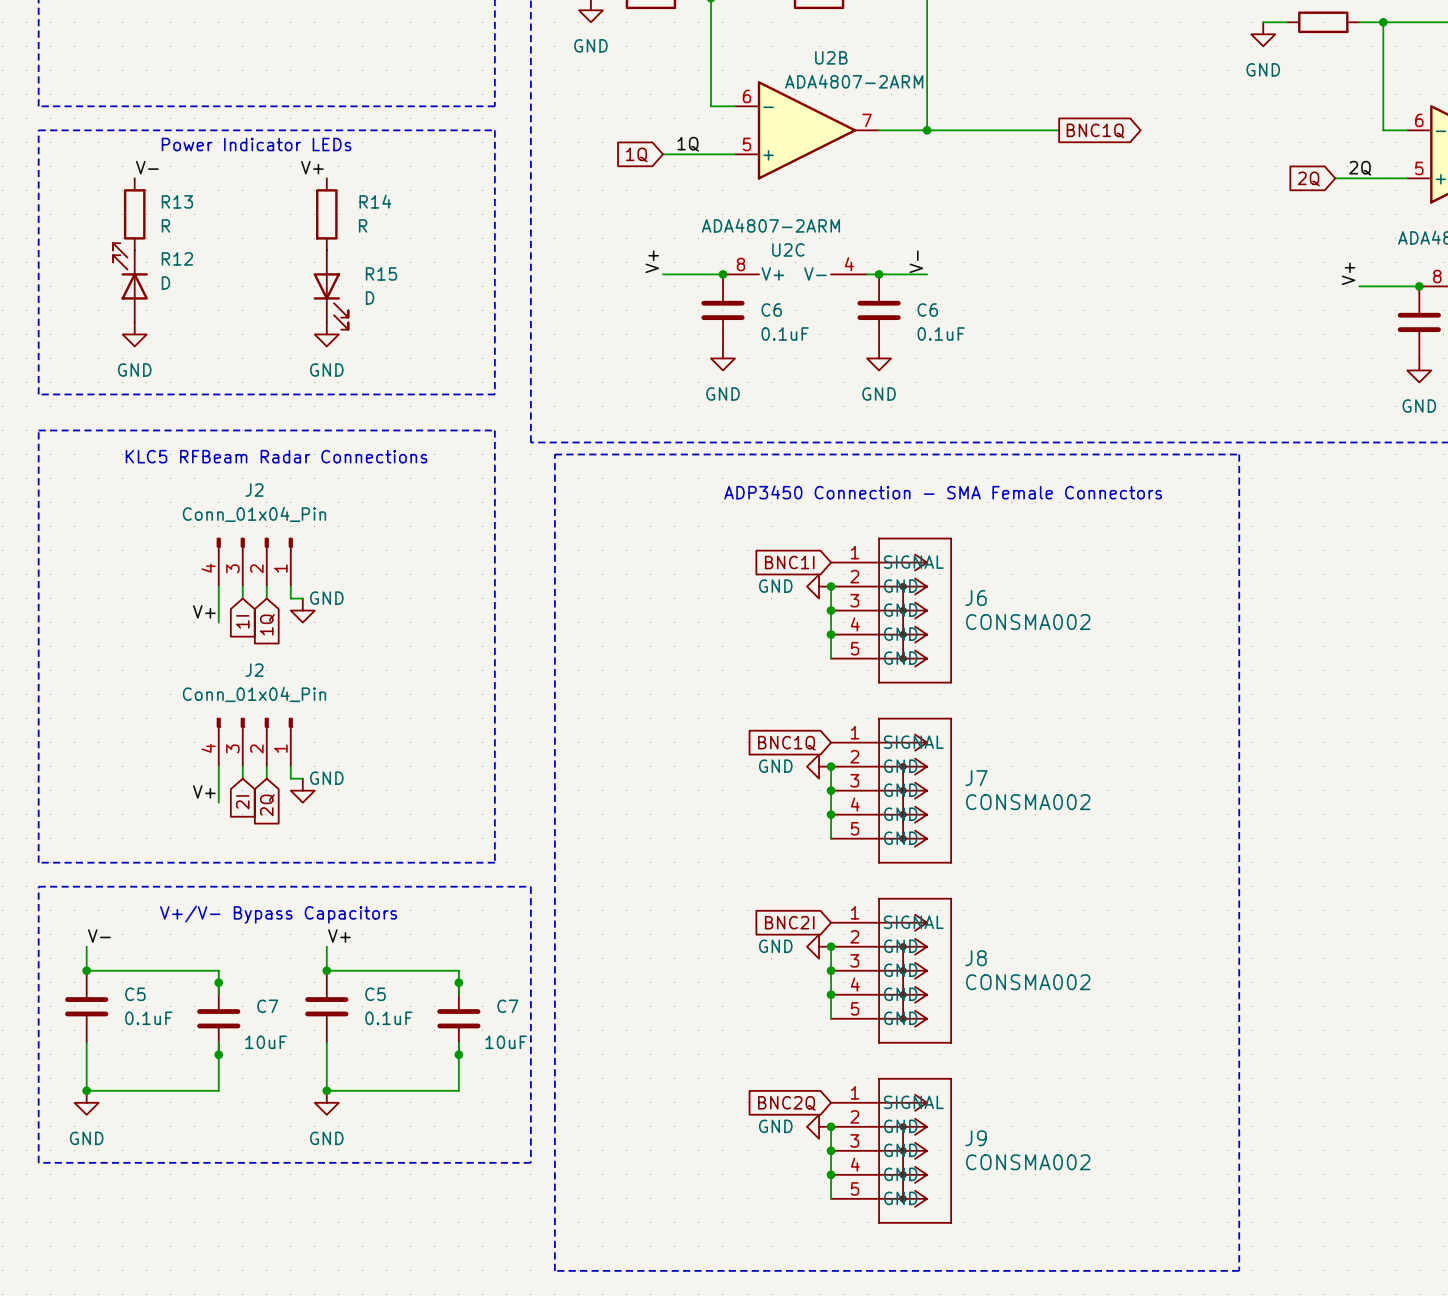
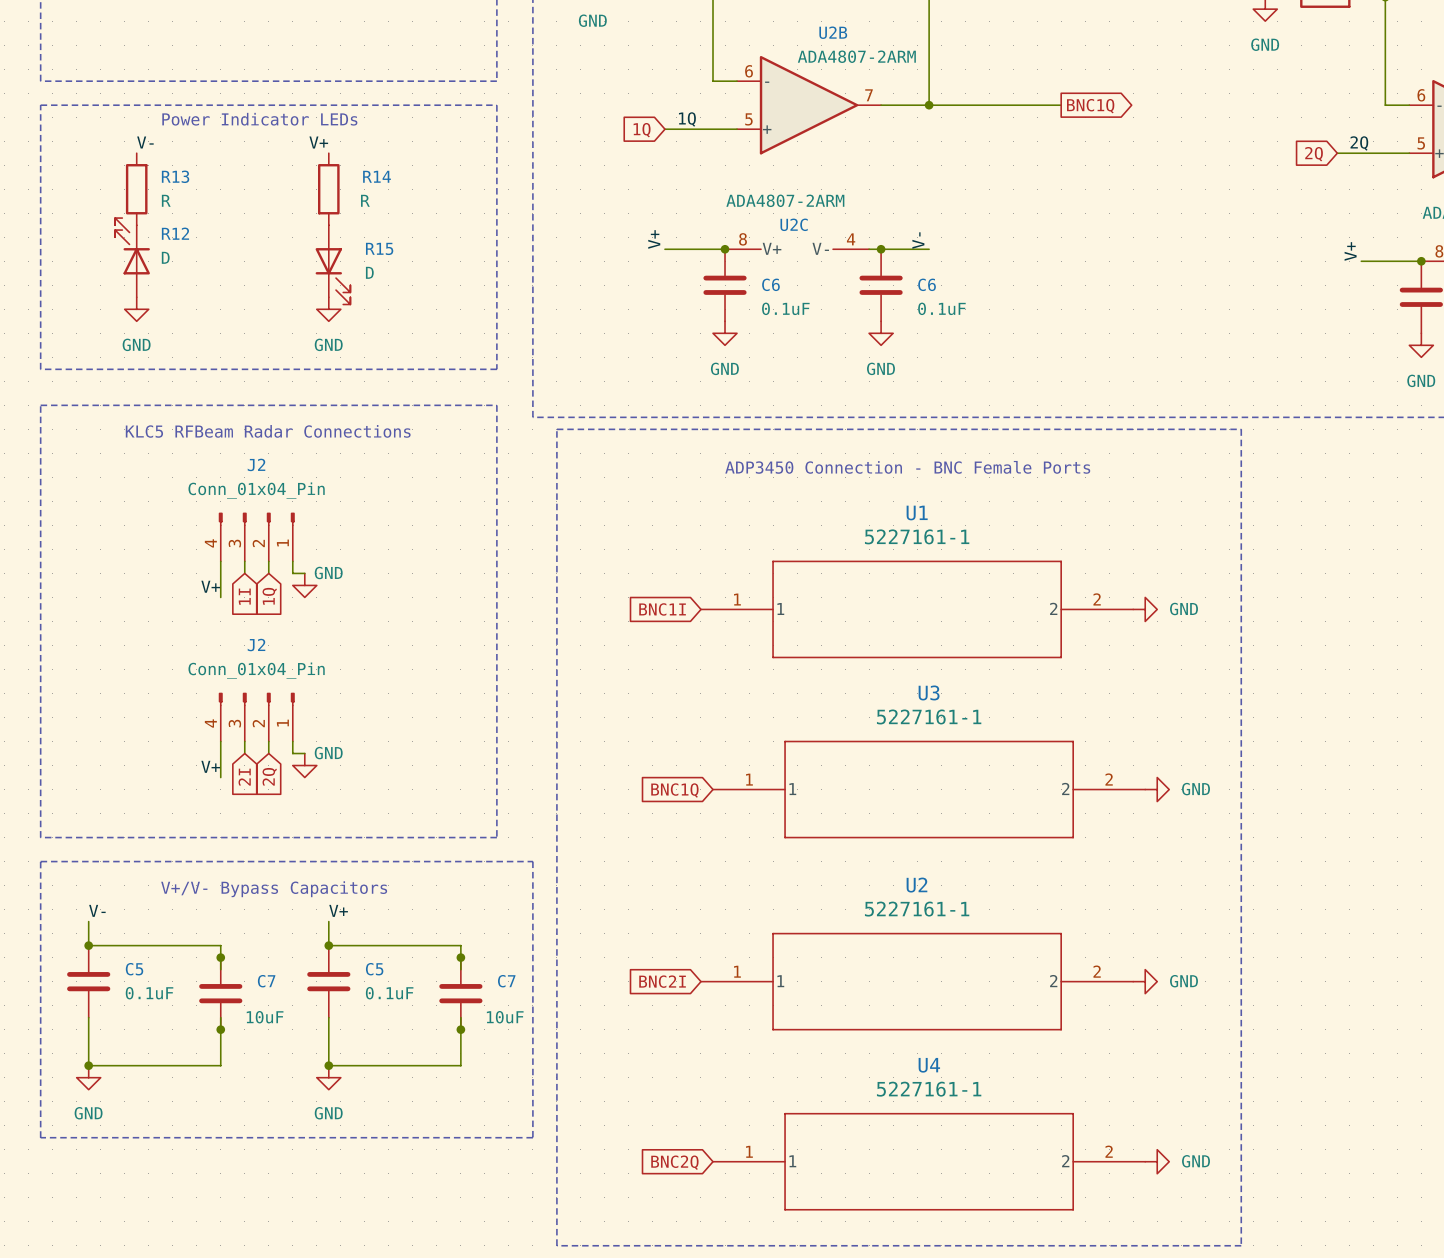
text: ADP3450 Connection - SMA Female Connectors (943, 492) -> ADP3450 Connection - BNC Female Ports (907, 467)
global label position: BNC1I (789, 562) -> BNC1I (662, 609)
power symbol: GND (819, 586) -> none
wire: (831, 586) (831, 658) -> none
junction: (831, 586) -> none
junction: (831, 610) -> none
J6: CONSMA002 (891, 610) -> none
junction: (831, 634) -> none
U1: none -> 5227161-1 (917, 609)
power symbol: none -> GND (1145, 609)
global label position: BNC1Q (786, 743) -> BNC1Q (674, 790)
power symbol: GND (819, 766) -> none
wire: (831, 766) (831, 838) -> none
junction: (831, 766) -> none
junction: (831, 790) -> none
J7: CONSMA002 (891, 790) -> none
junction: (831, 814) -> none
U3: none -> 5227161-1 (929, 789)
power symbol: none -> GND (1157, 789)
global label position: BNC2I (789, 922) -> BNC2I (662, 981)
power symbol: GND (819, 946) -> none
wire: (831, 946) (831, 1018) -> none
junction: (831, 946) -> none
junction: (831, 970) -> none
J8: CONSMA002 (891, 970) -> none
junction: (831, 994) -> none
U2: none -> 5227161-1 (917, 981)
power symbol: none -> GND (1145, 981)
global label position: BNC2Q (786, 1103) -> BNC2Q (674, 1162)
power symbol: GND (819, 1126) -> none
wire: (831, 1126) (831, 1198) -> none
junction: (831, 1126) -> none
junction: (831, 1150) -> none
J9: CONSMA002 (891, 1150) -> none
junction: (831, 1174) -> none
U4: none -> 5227161-1 (929, 1161)
power symbol: none -> GND (1157, 1161)

